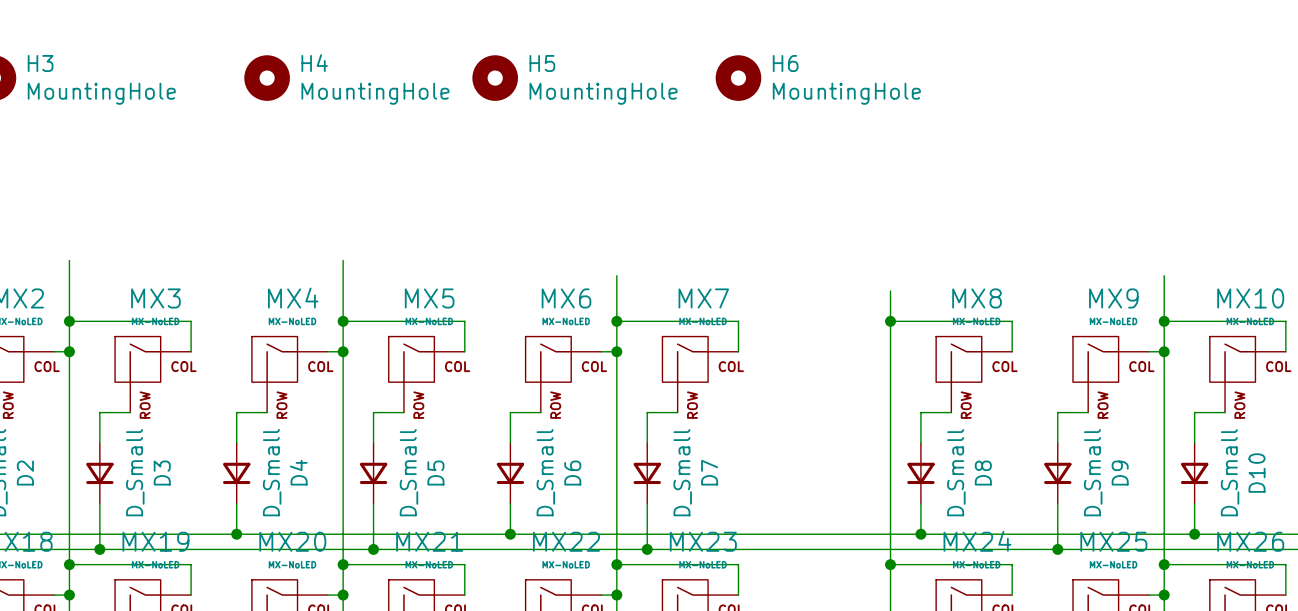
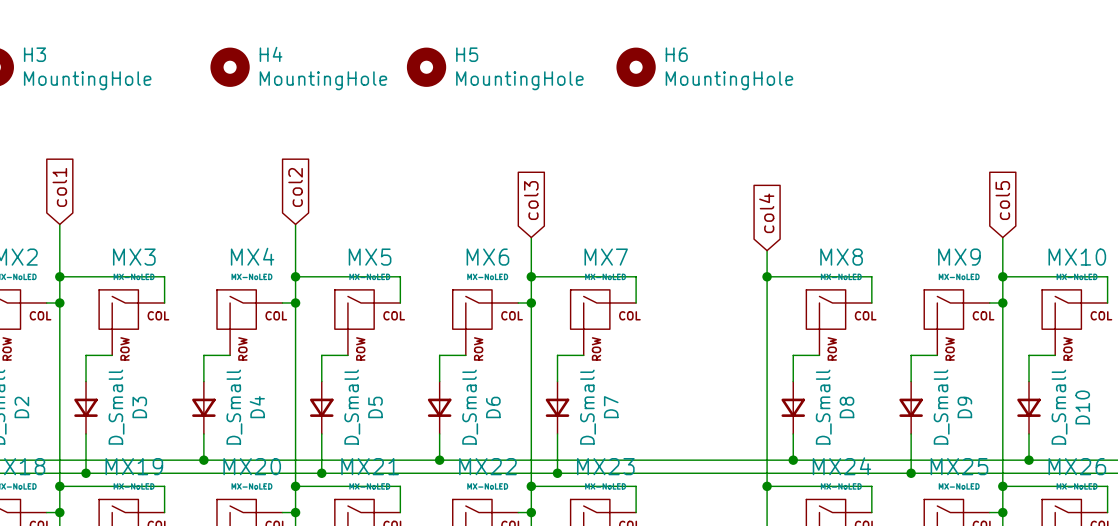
global label: none -> col1 (59, 187)
global label: none -> col2 (295, 187)
global label: none -> col3 (531, 200)
global label: none -> col5 (1002, 200)
global label: none -> col4 (766, 213)

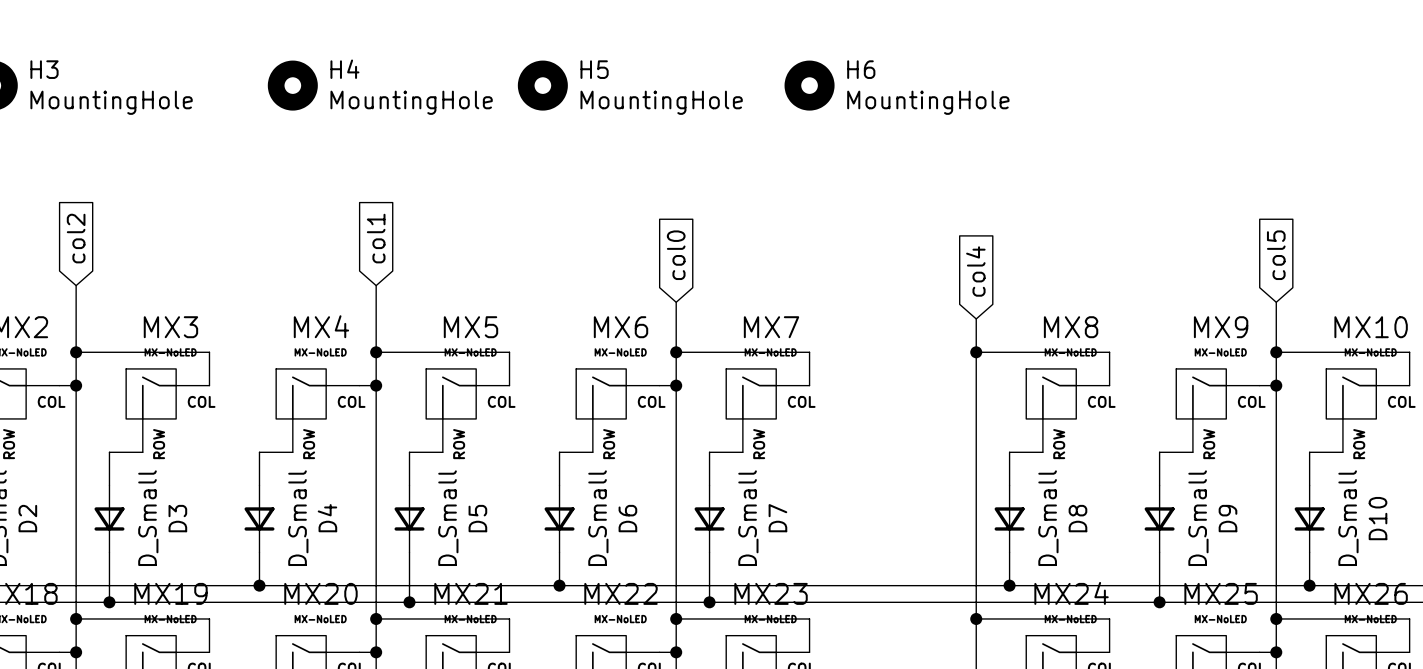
global label: col1 (59, 187) -> col2 (76, 238)
global label: col2 (295, 187) -> col1 (376, 238)
global label: col3 (531, 200) -> col0 (676, 255)

